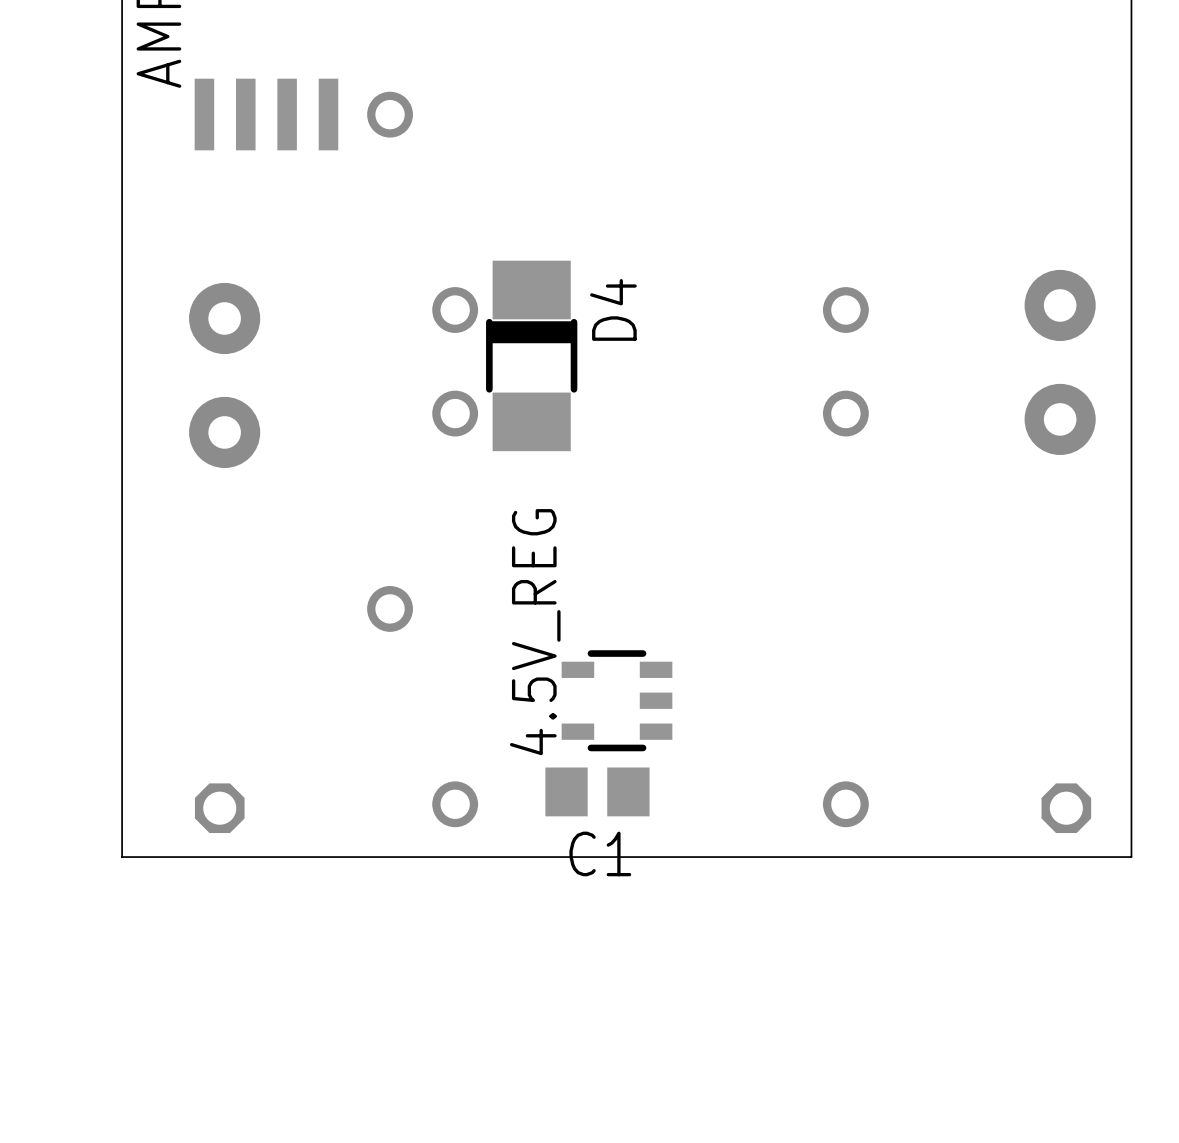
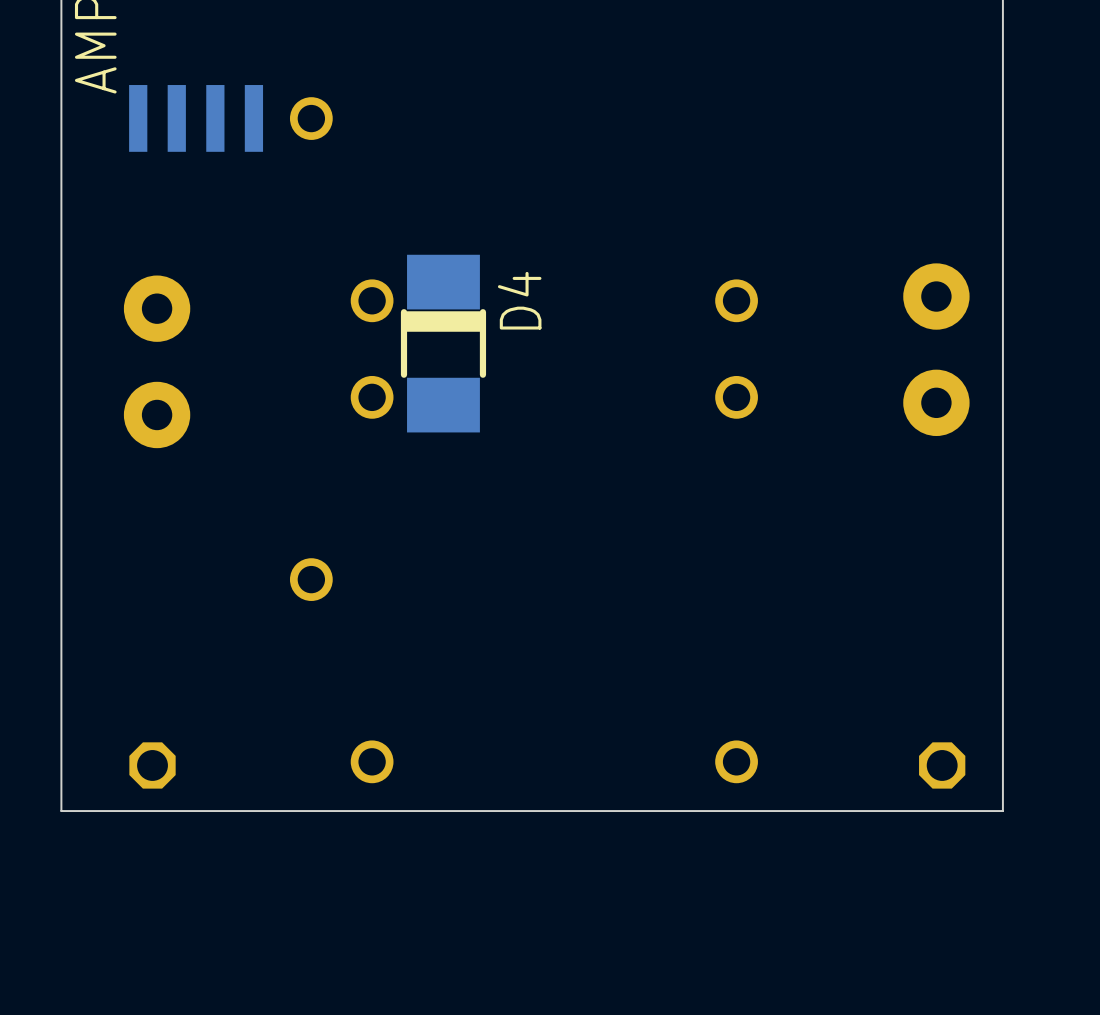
4.5V_REG: (617, 700) -> none
C1: (597, 791) -> none

